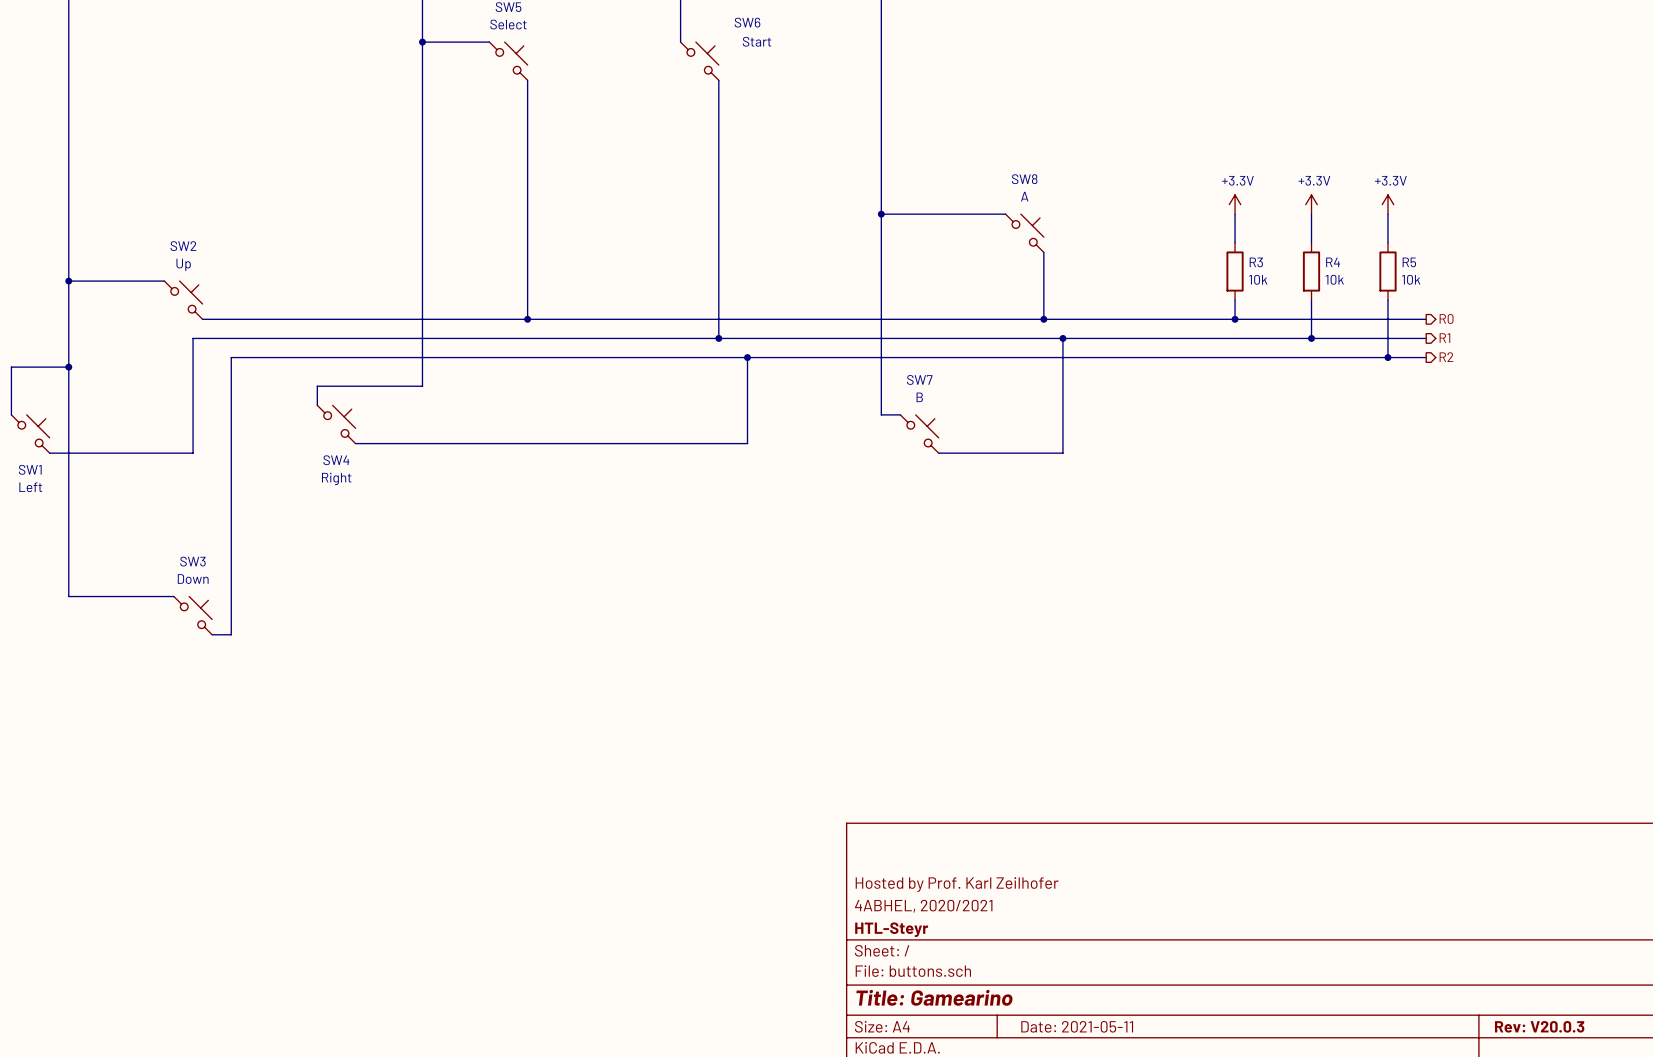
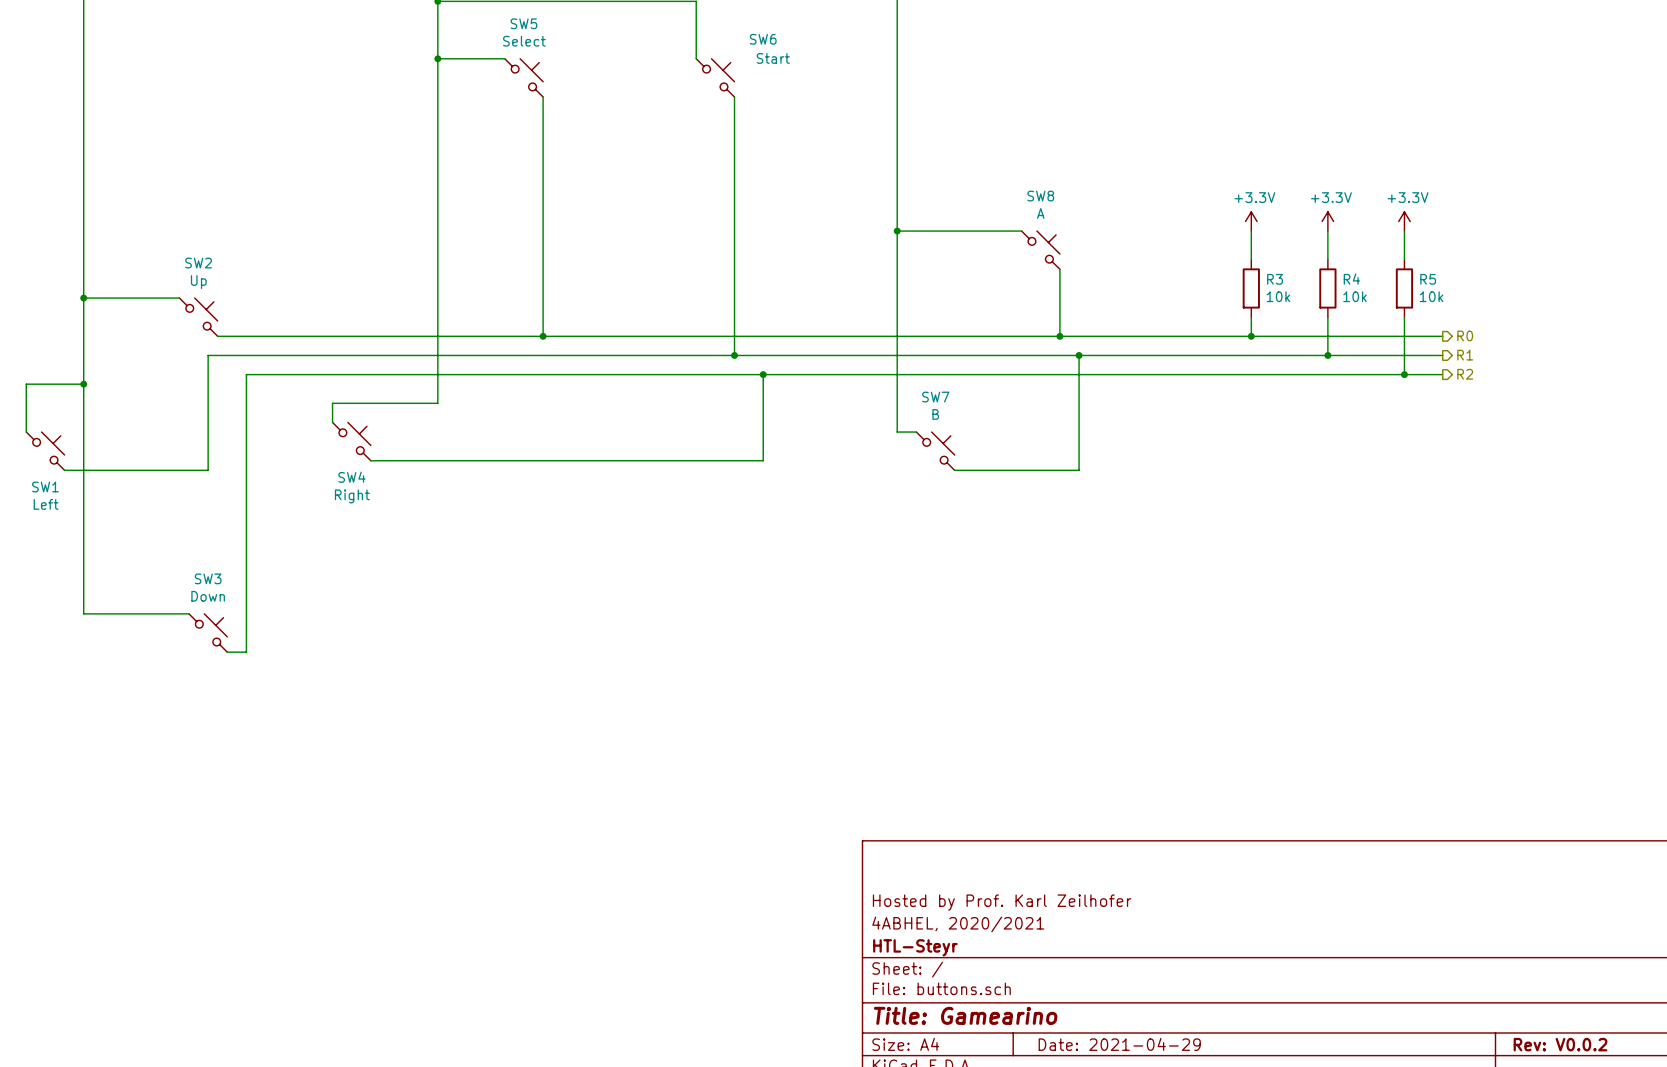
title block: Date: 2021-05-11 (1077, 1026) -> Date: 2021-04-29 (1119, 1044)
title block: Rev: V20.0.3 (1539, 1026) -> Rev: V0.0.2 (1560, 1044)

